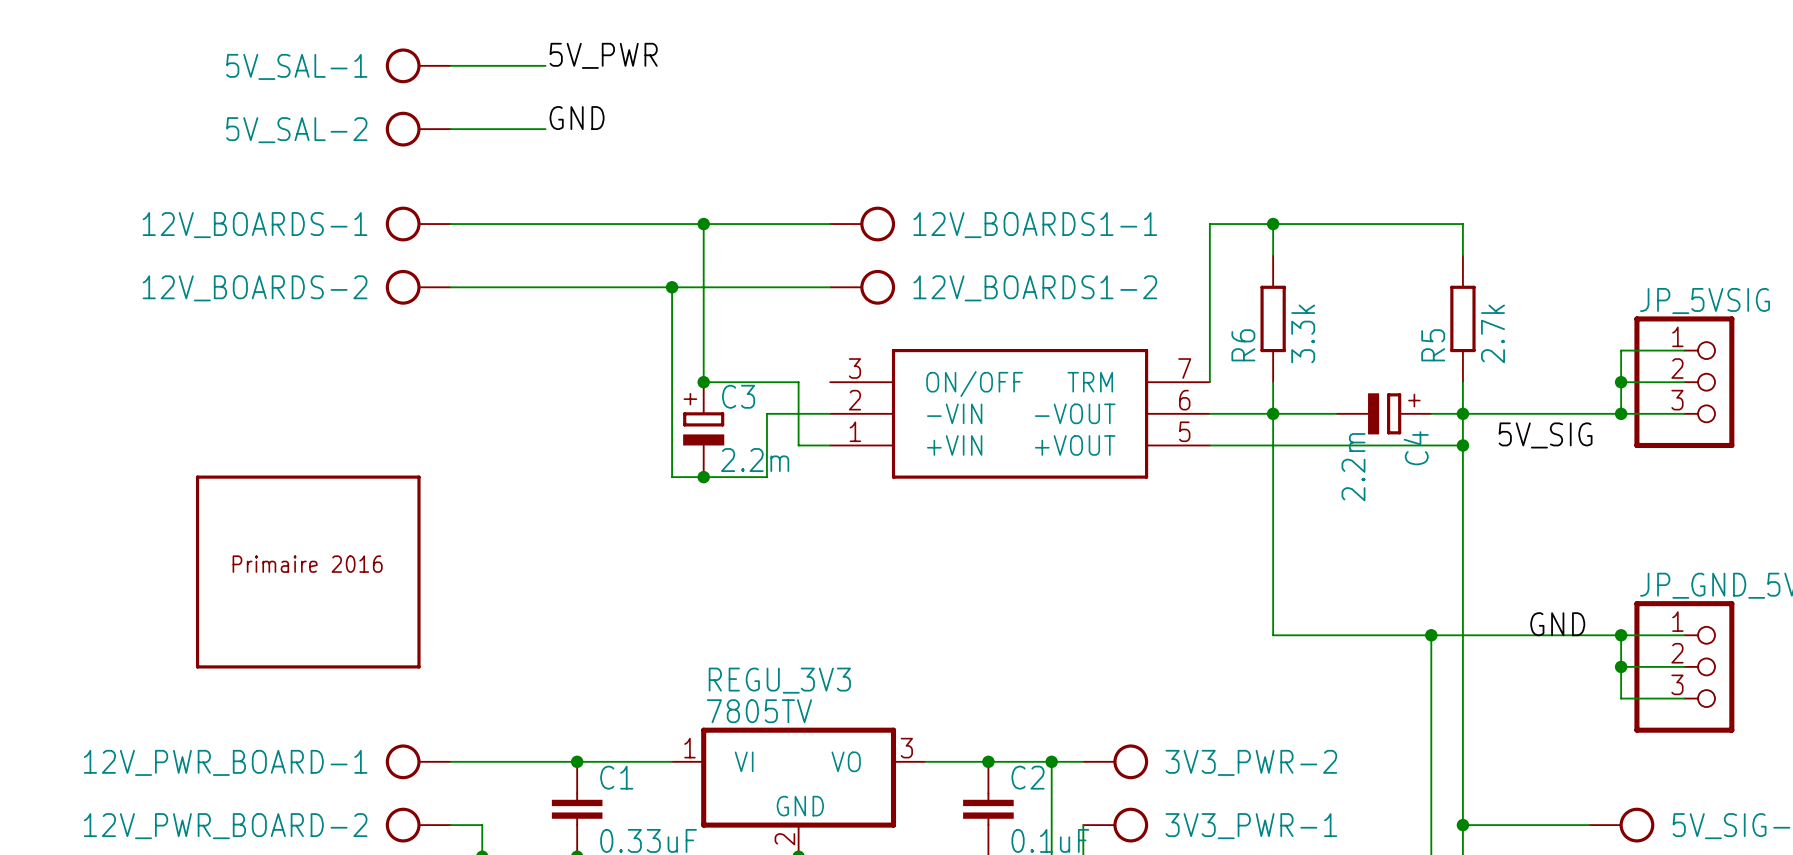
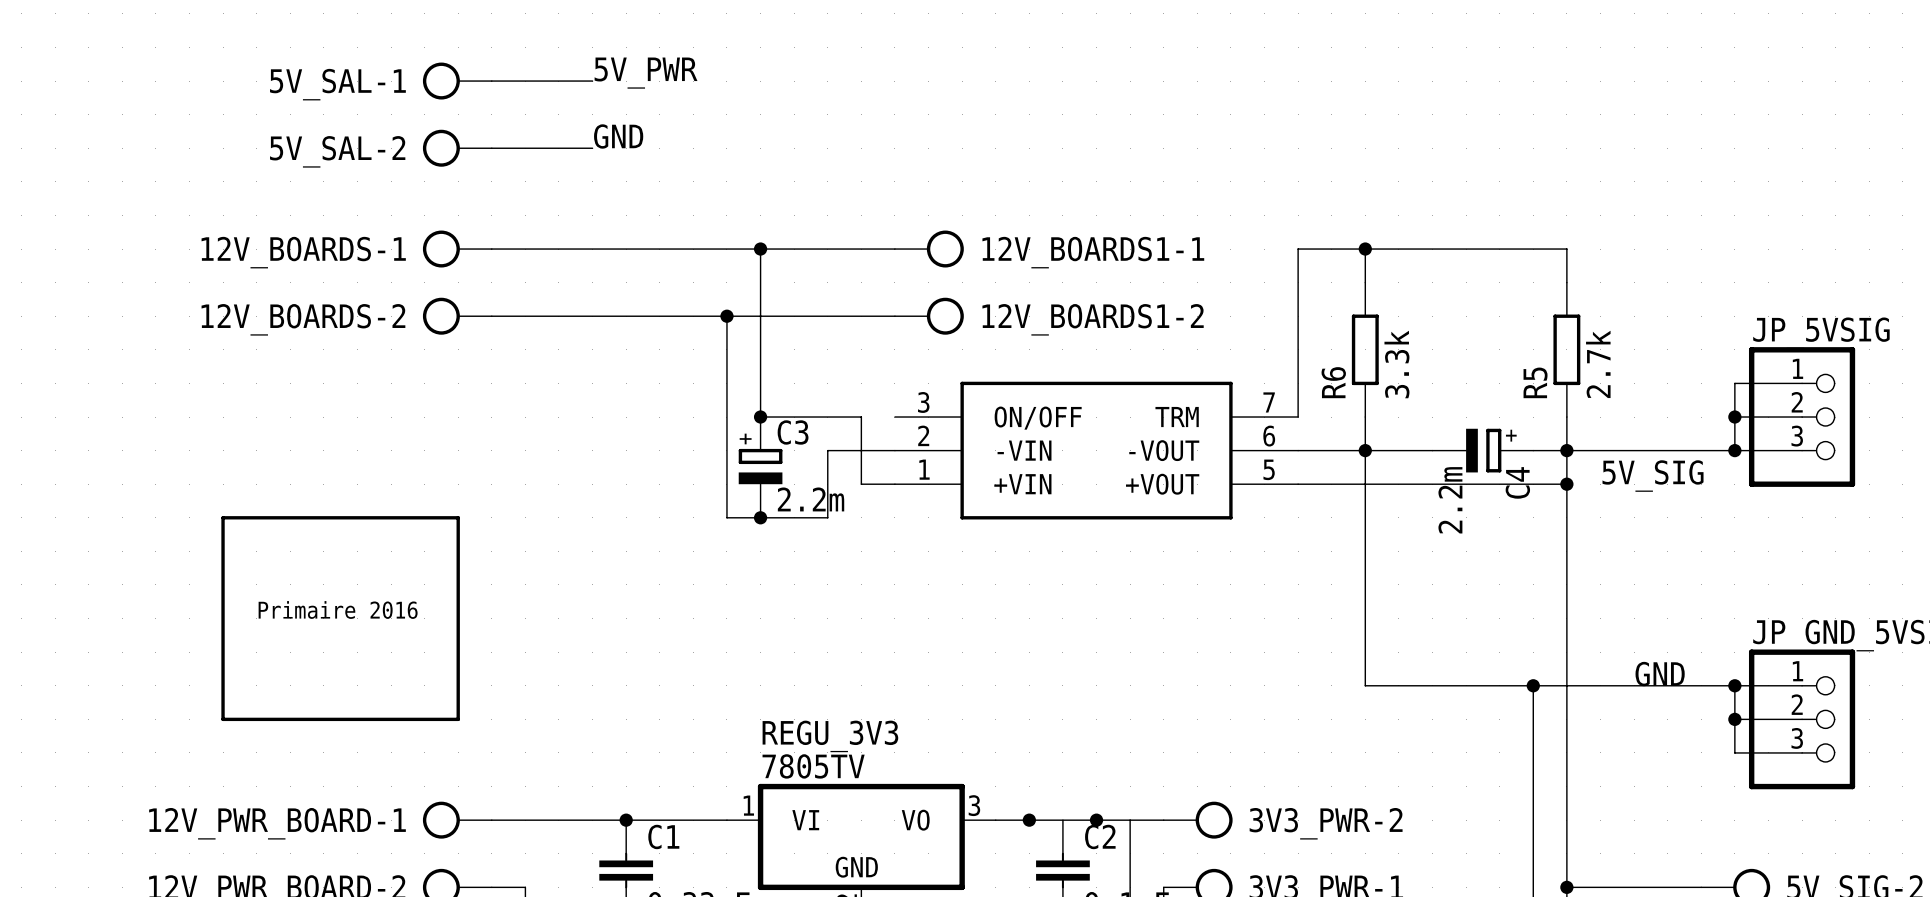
junction: none -> (1029, 820)
junction: (988, 761) -> none
junction: none -> (1096, 820)
junction: (1051, 761) -> none

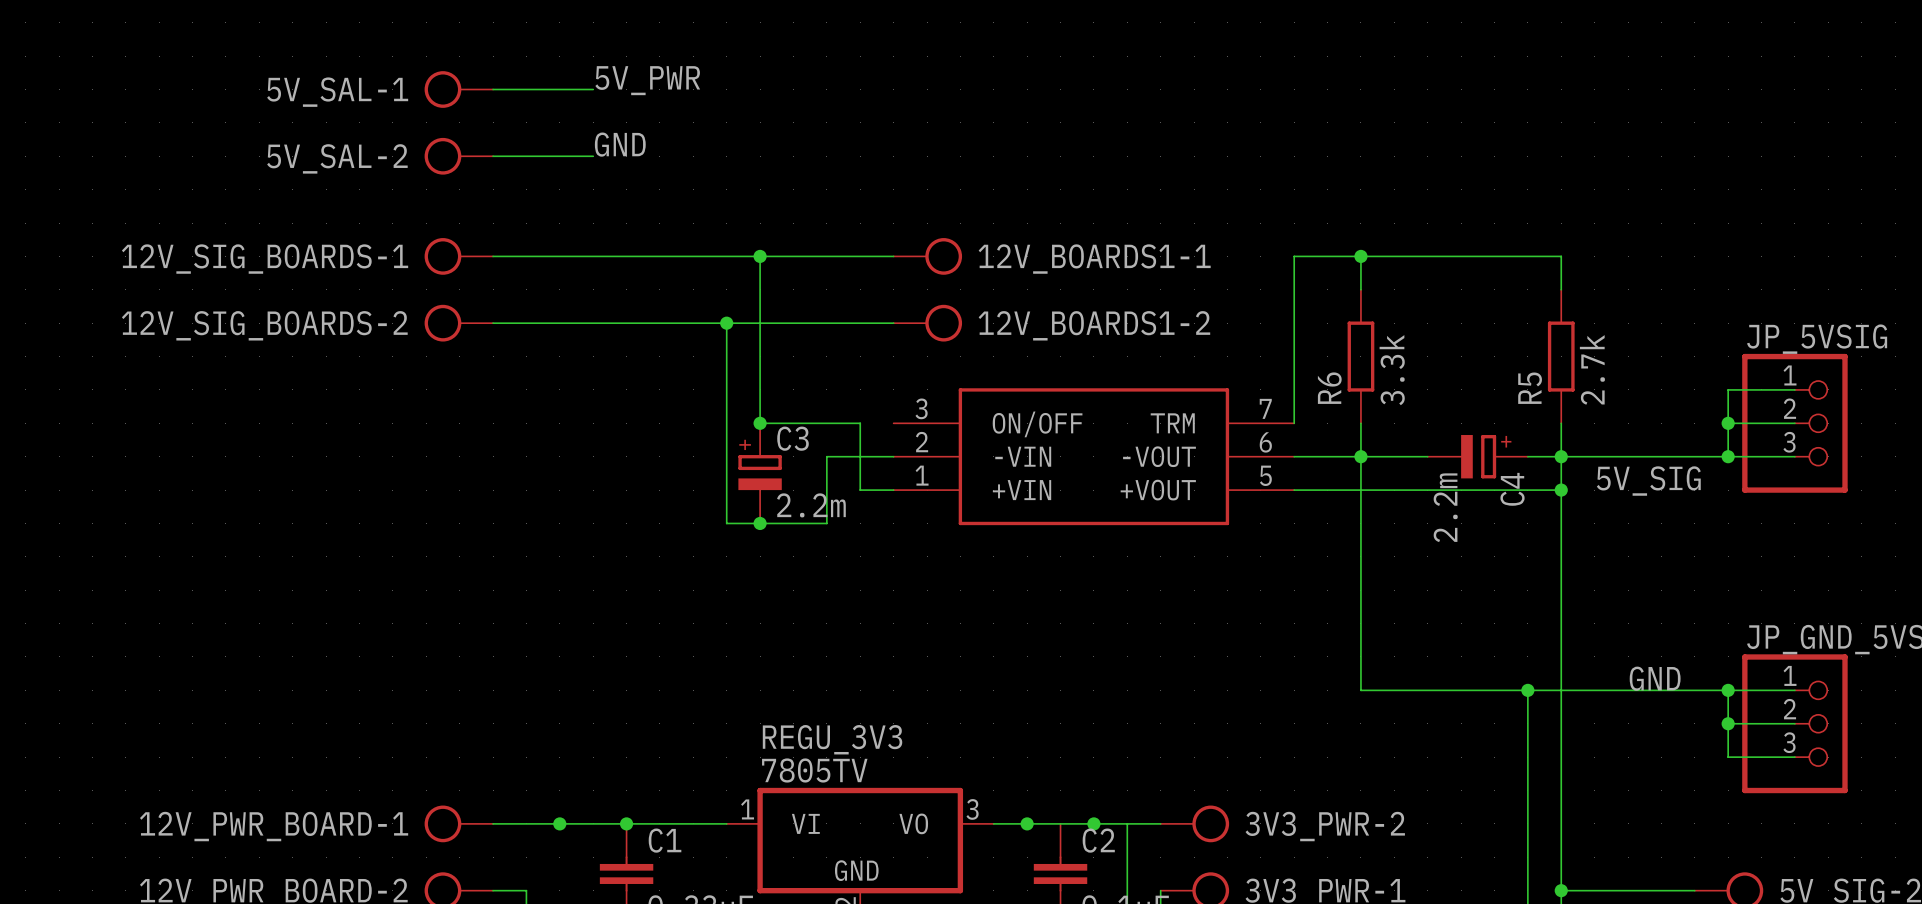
12V_BOARDS-1 name: 12V_BOARDS-1 (303, 252) -> 12V_SIG_BOARDS-1 (265, 259)
12V_BOARDS-2 name: 12V_BOARDS-2 (303, 319) -> 12V_SIG_BOARDS-2 (264, 325)
part: (340, 618) -> none
junction: none -> (559, 823)

